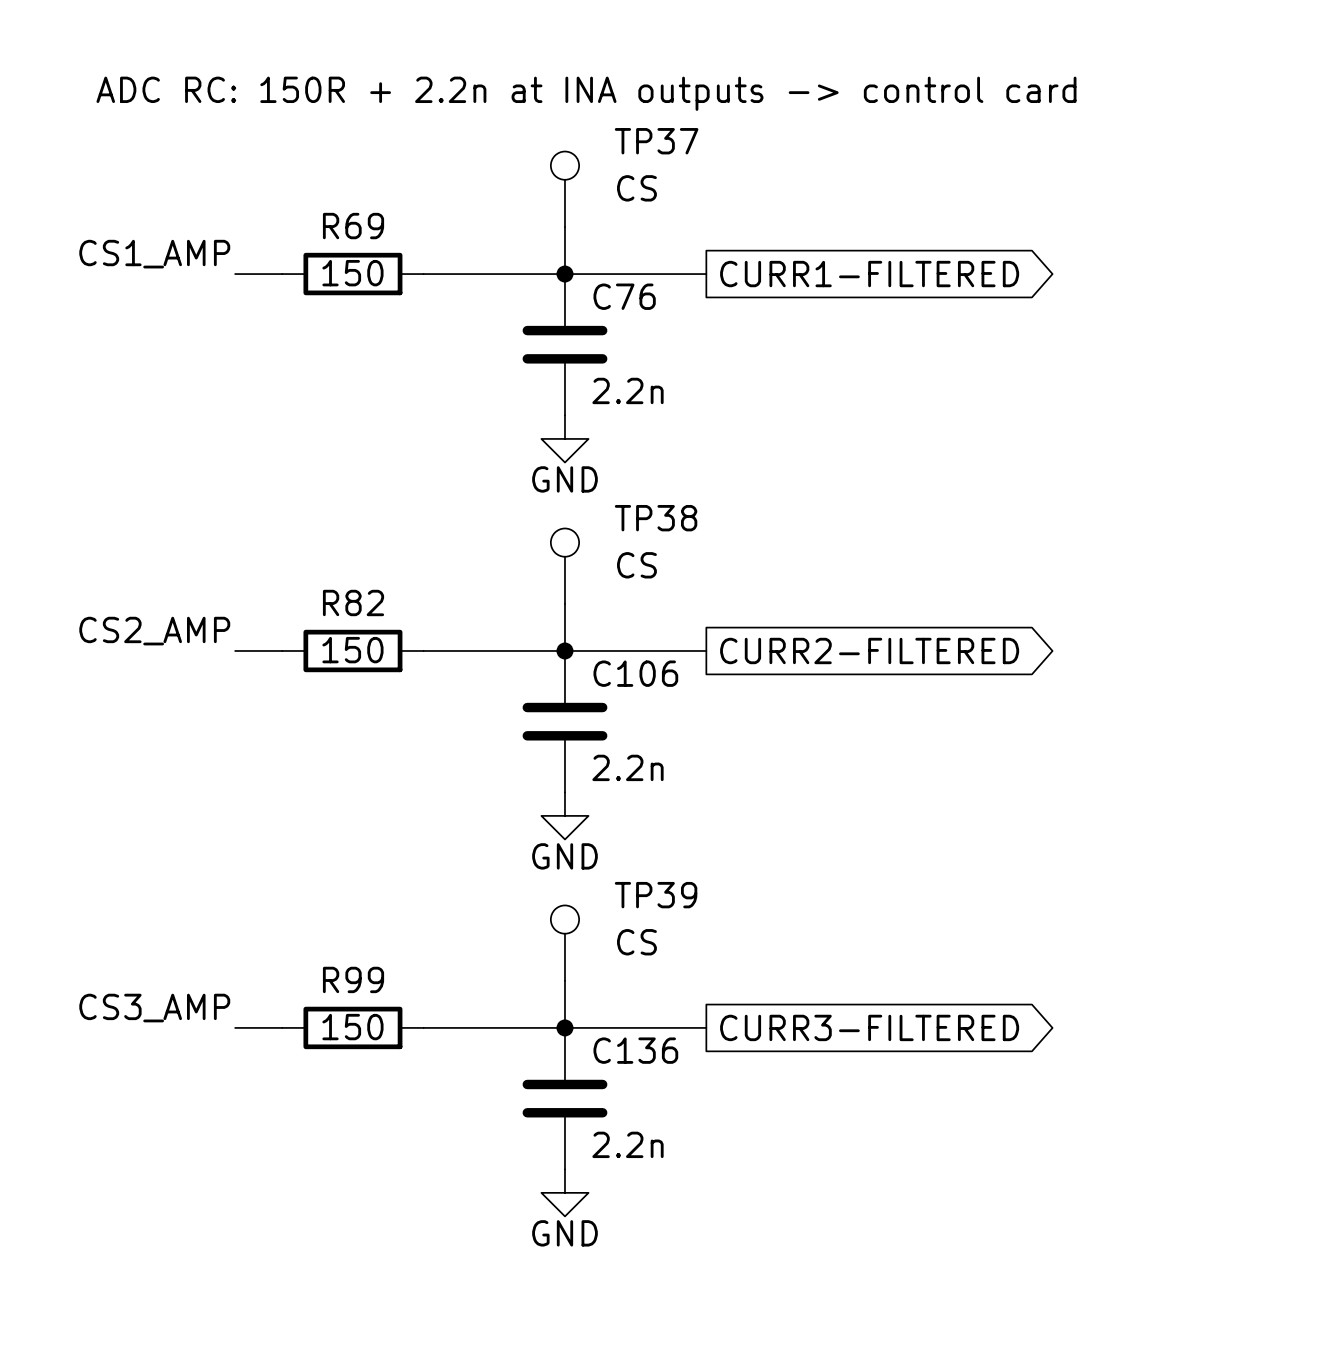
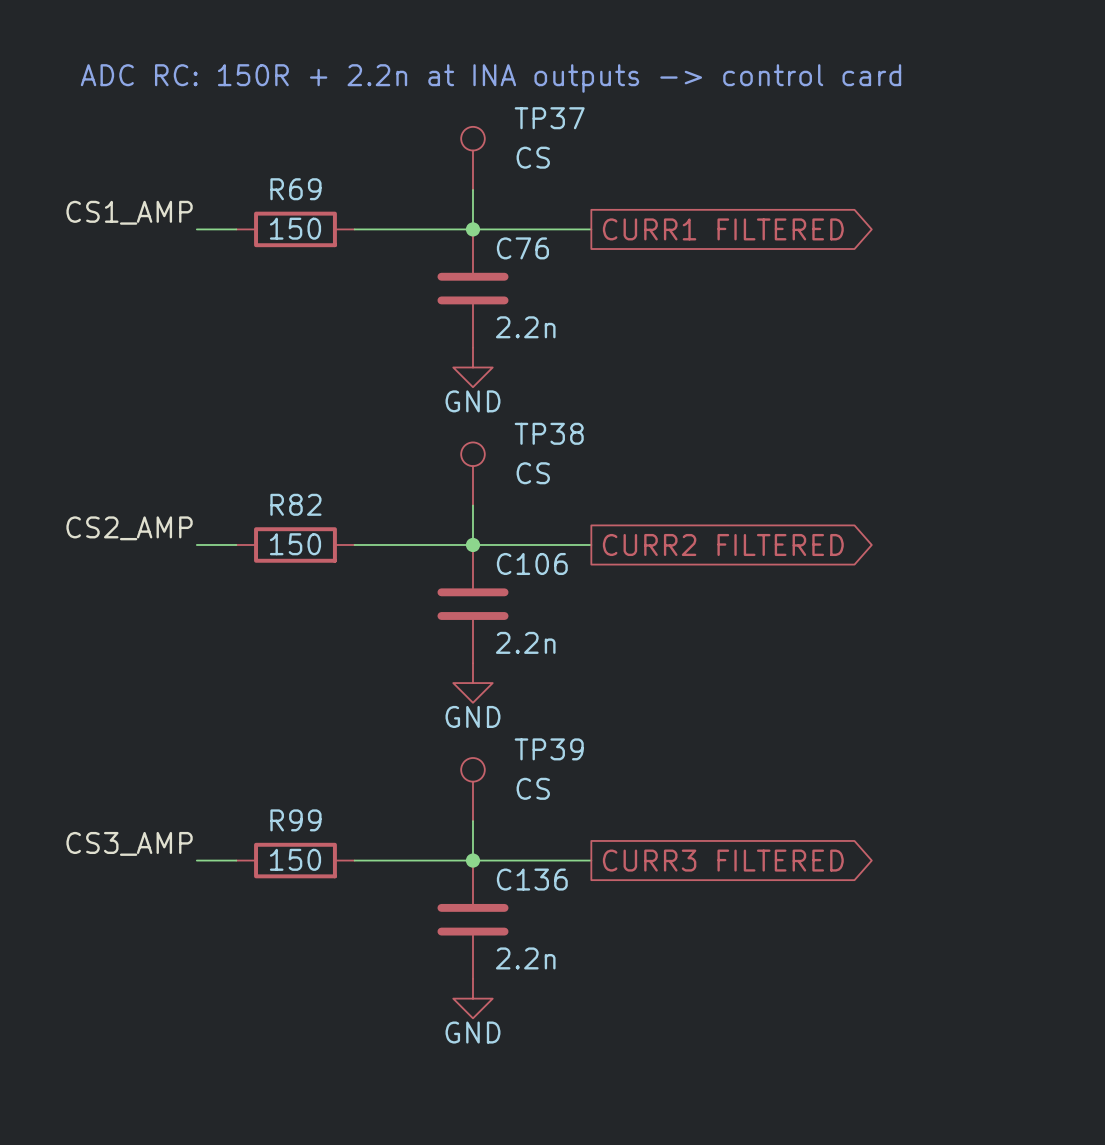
global label: CURR1-FILTERED (869, 274) -> CURR1 FILTERED (723, 229)
global label: CURR2-FILTERED (869, 650) -> CURR2 FILTERED (723, 544)
global label: CURR3-FILTERED (869, 1027) -> CURR3 FILTERED (723, 860)

